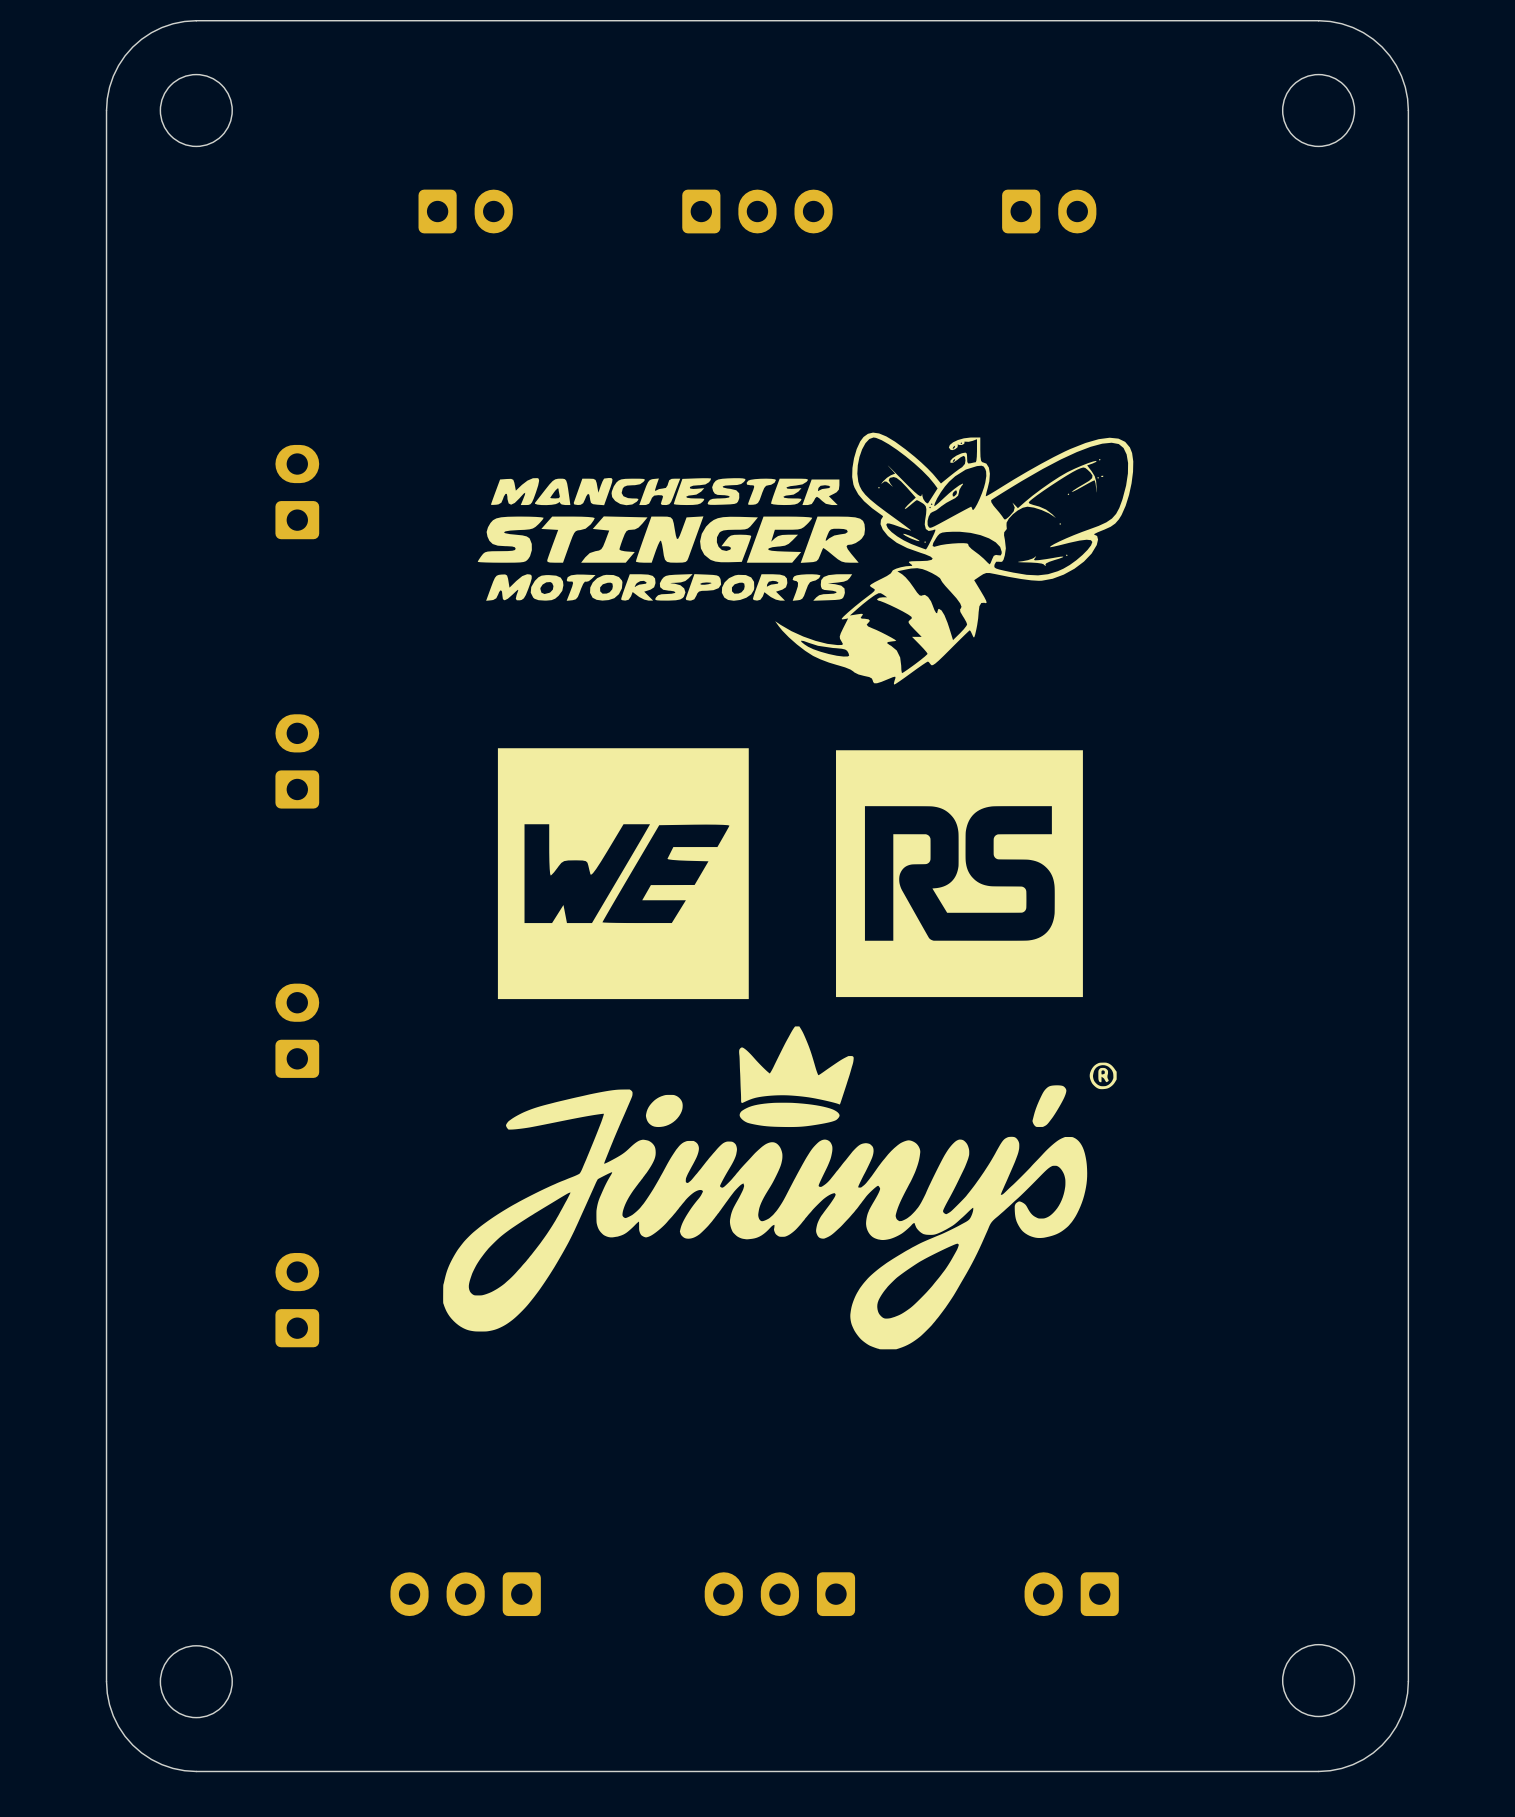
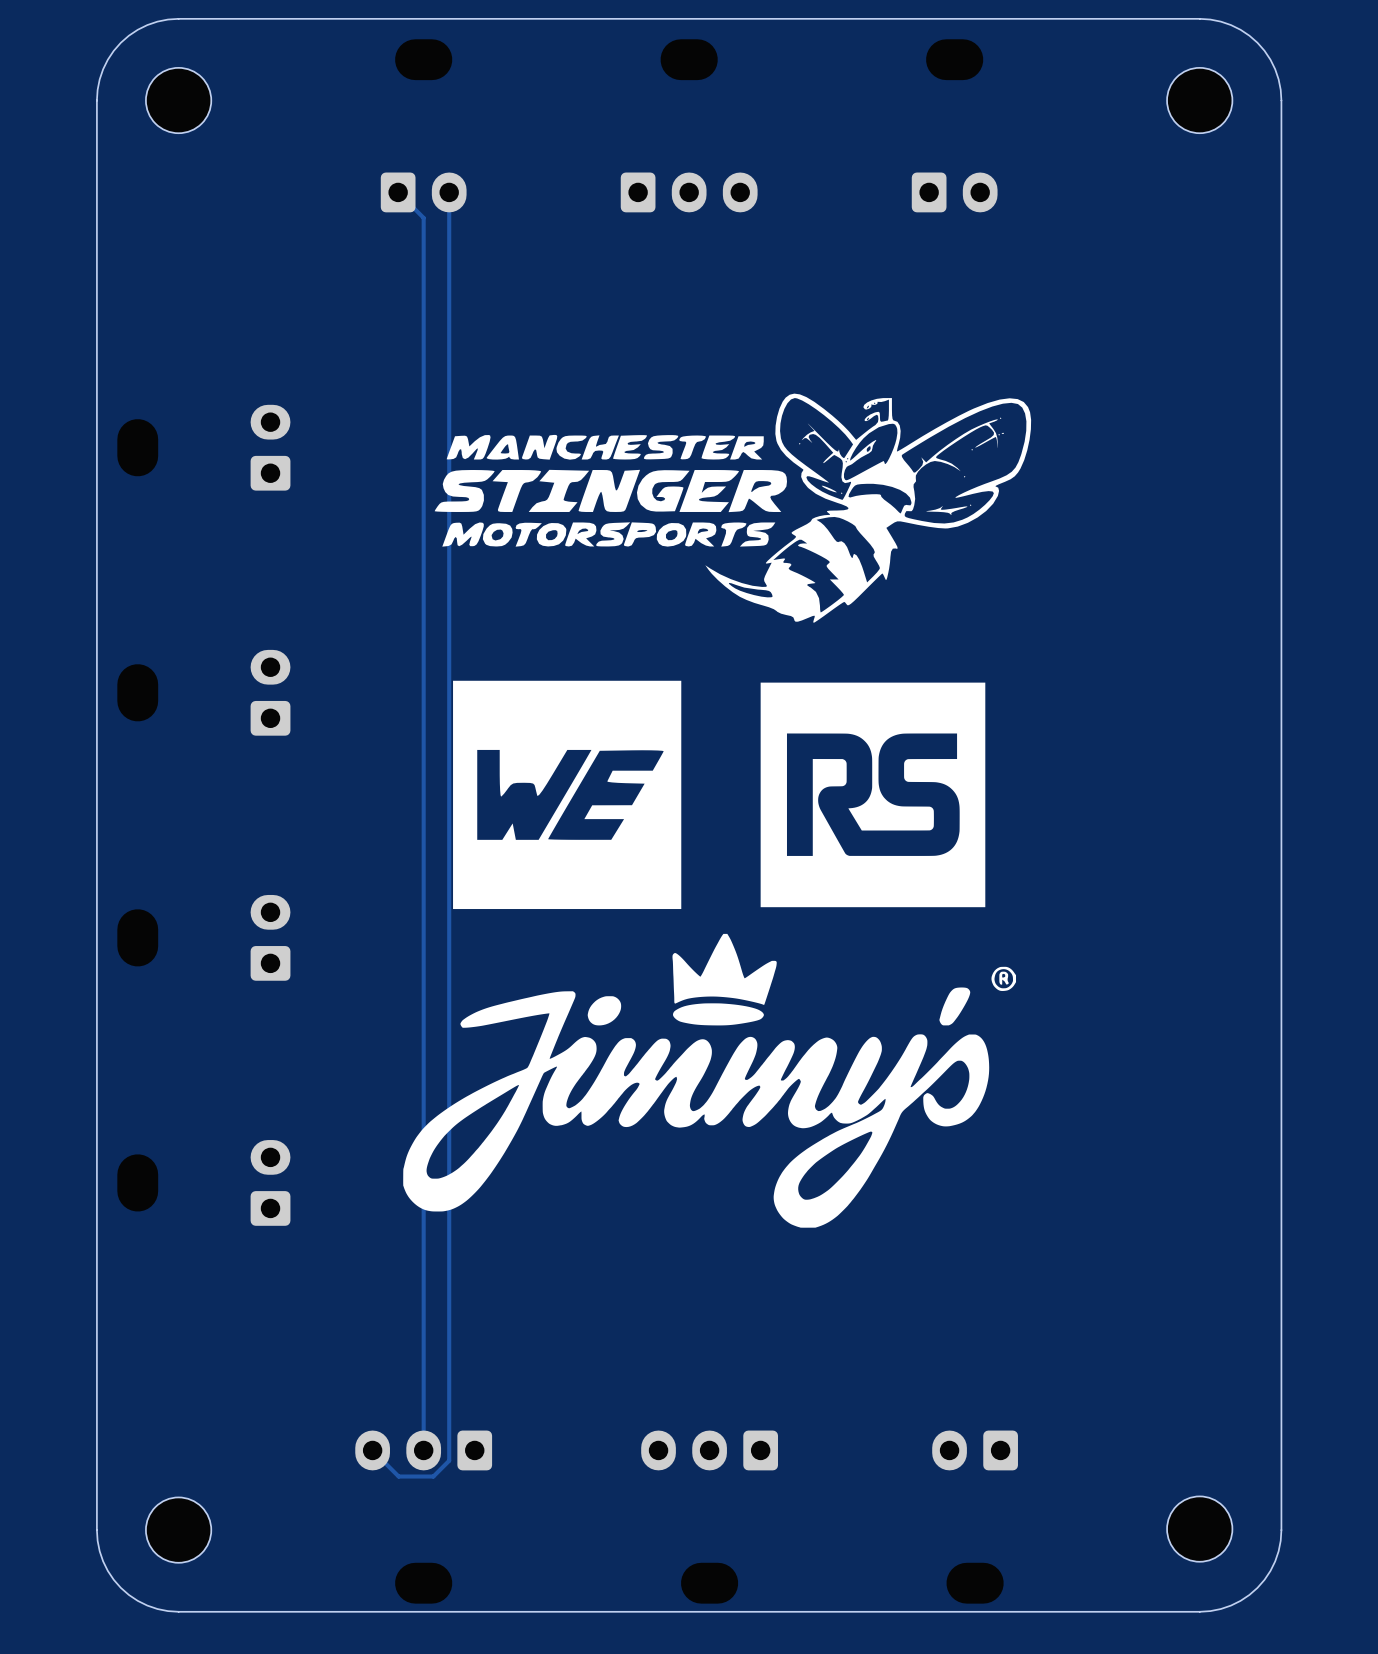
track: none -> (398, 192) (423, 217) (423, 1450)
track: none -> (449, 192) (449, 1460) (433, 1476) (398, 1476) (372, 1450)

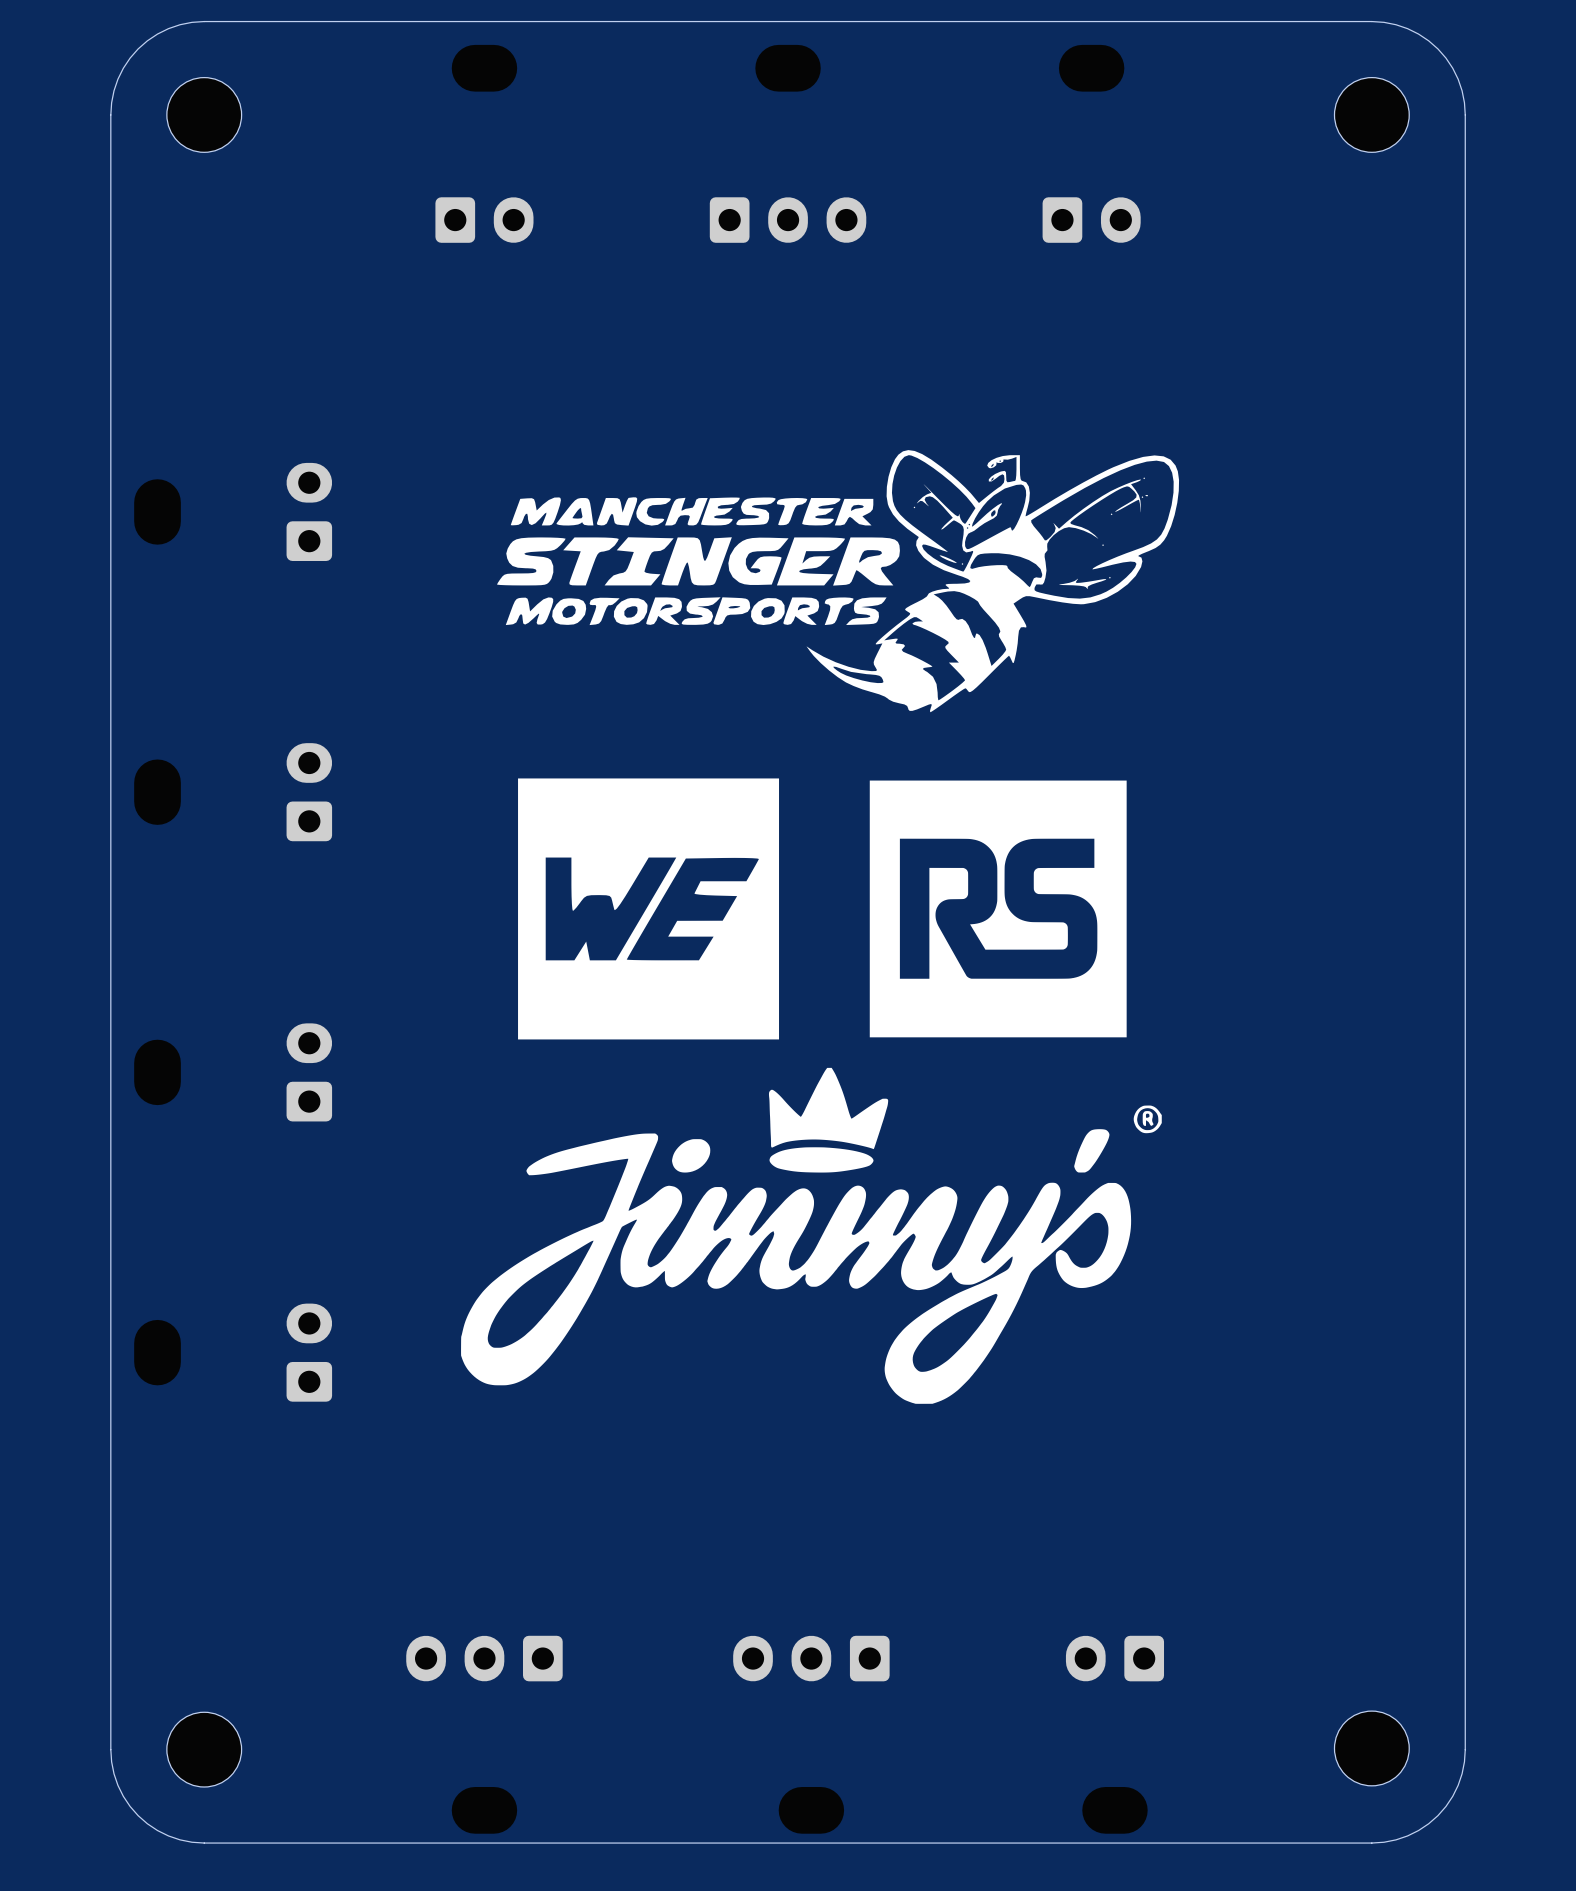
track: (398, 192) (423, 217) (423, 1450) -> none
track: (449, 192) (449, 1460) (433, 1476) (398, 1476) (372, 1450) -> none

